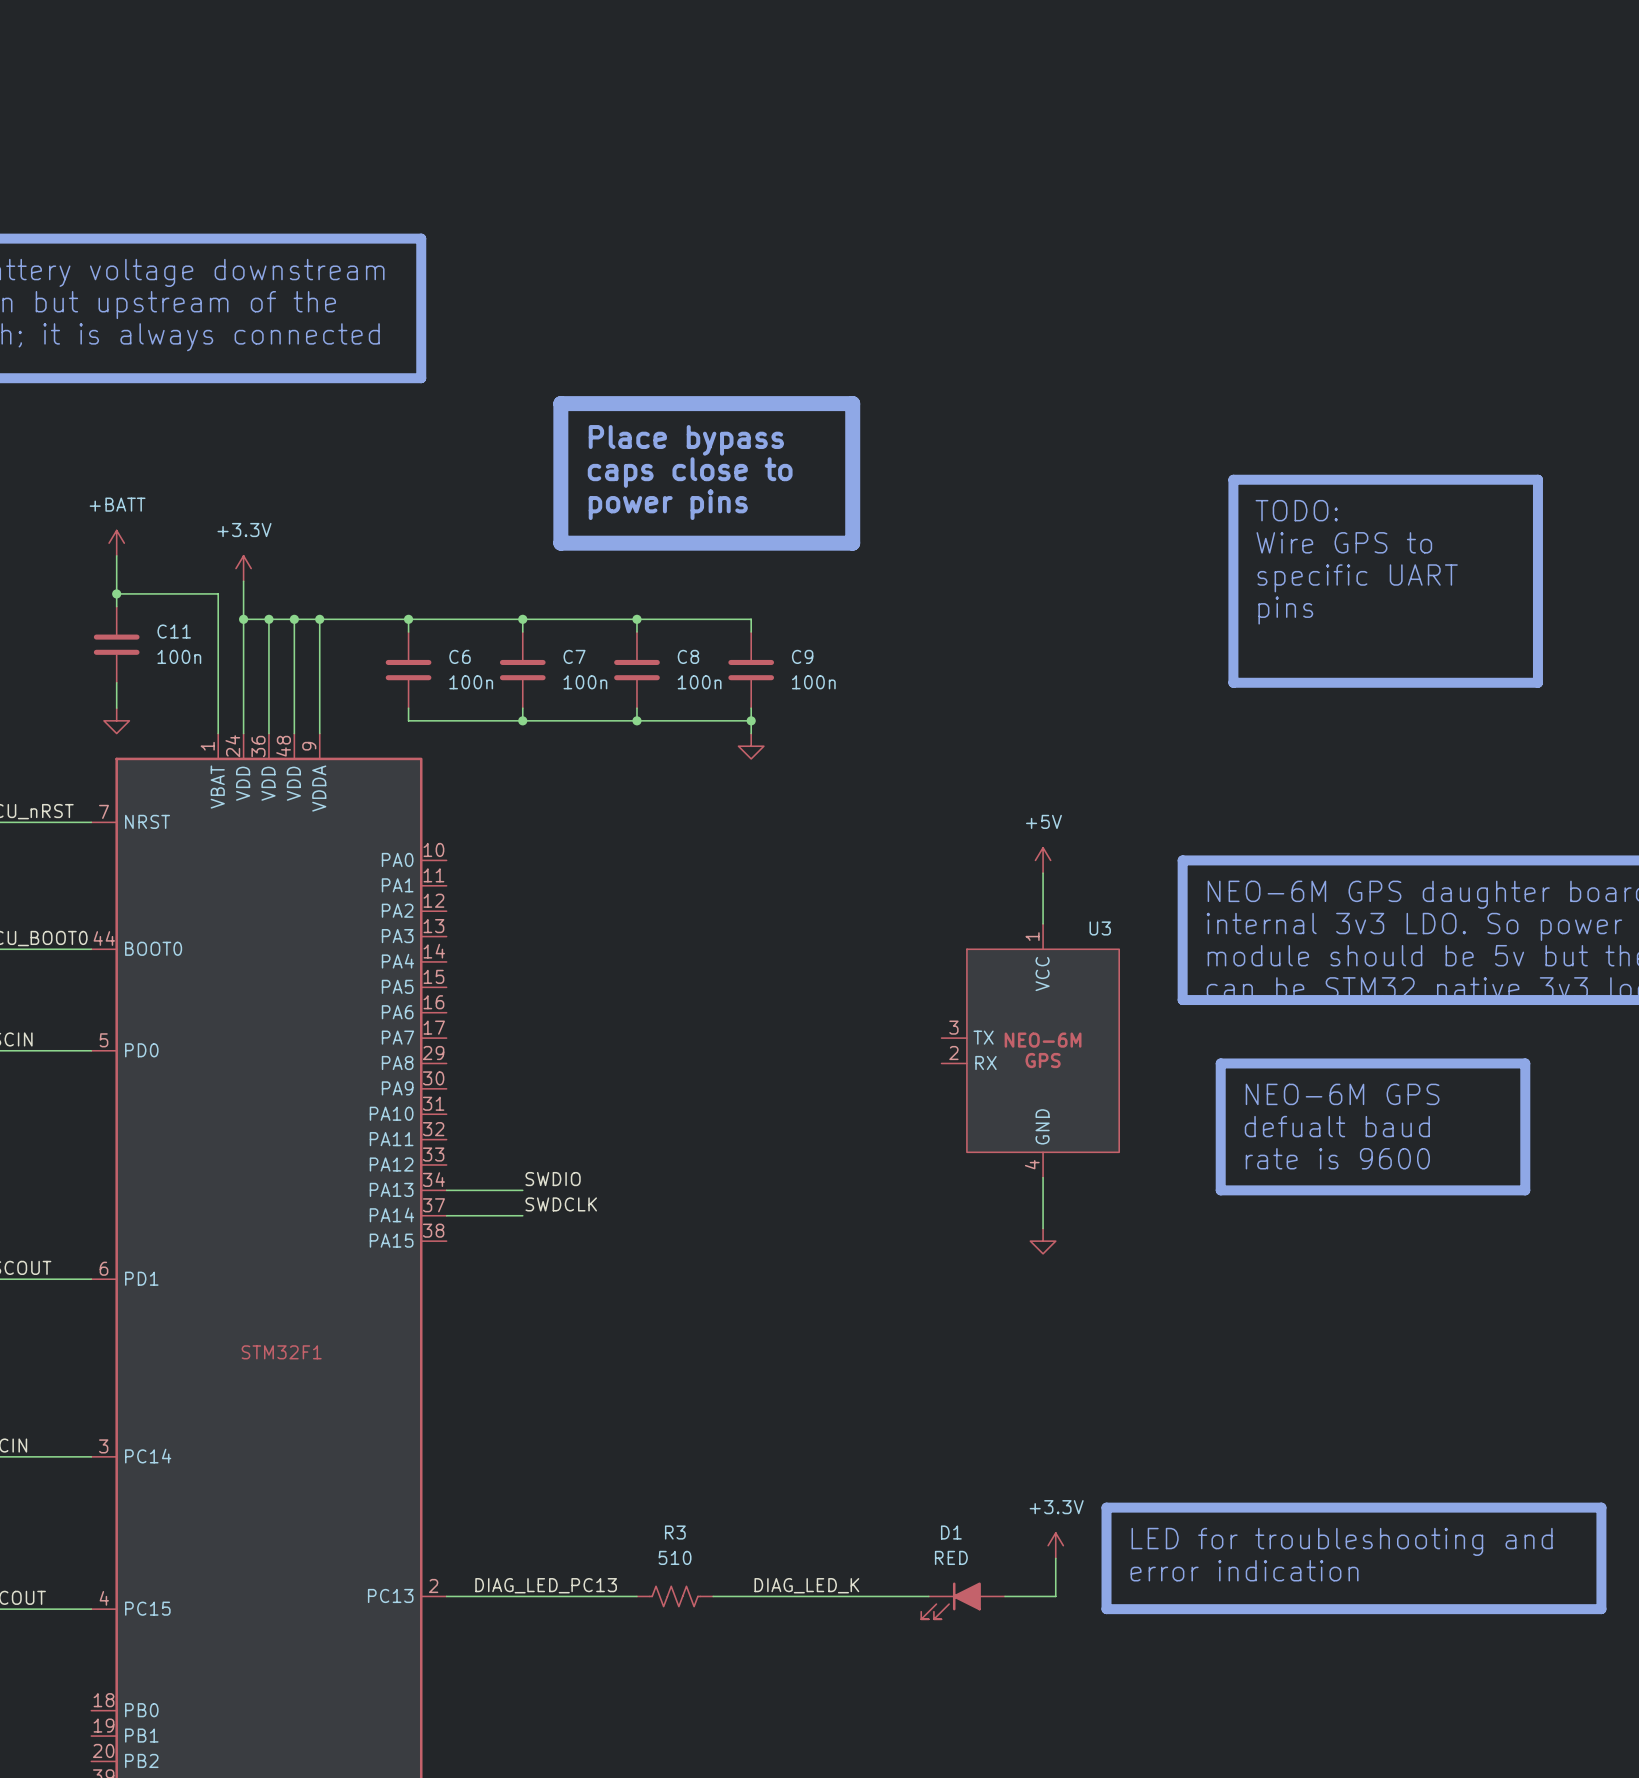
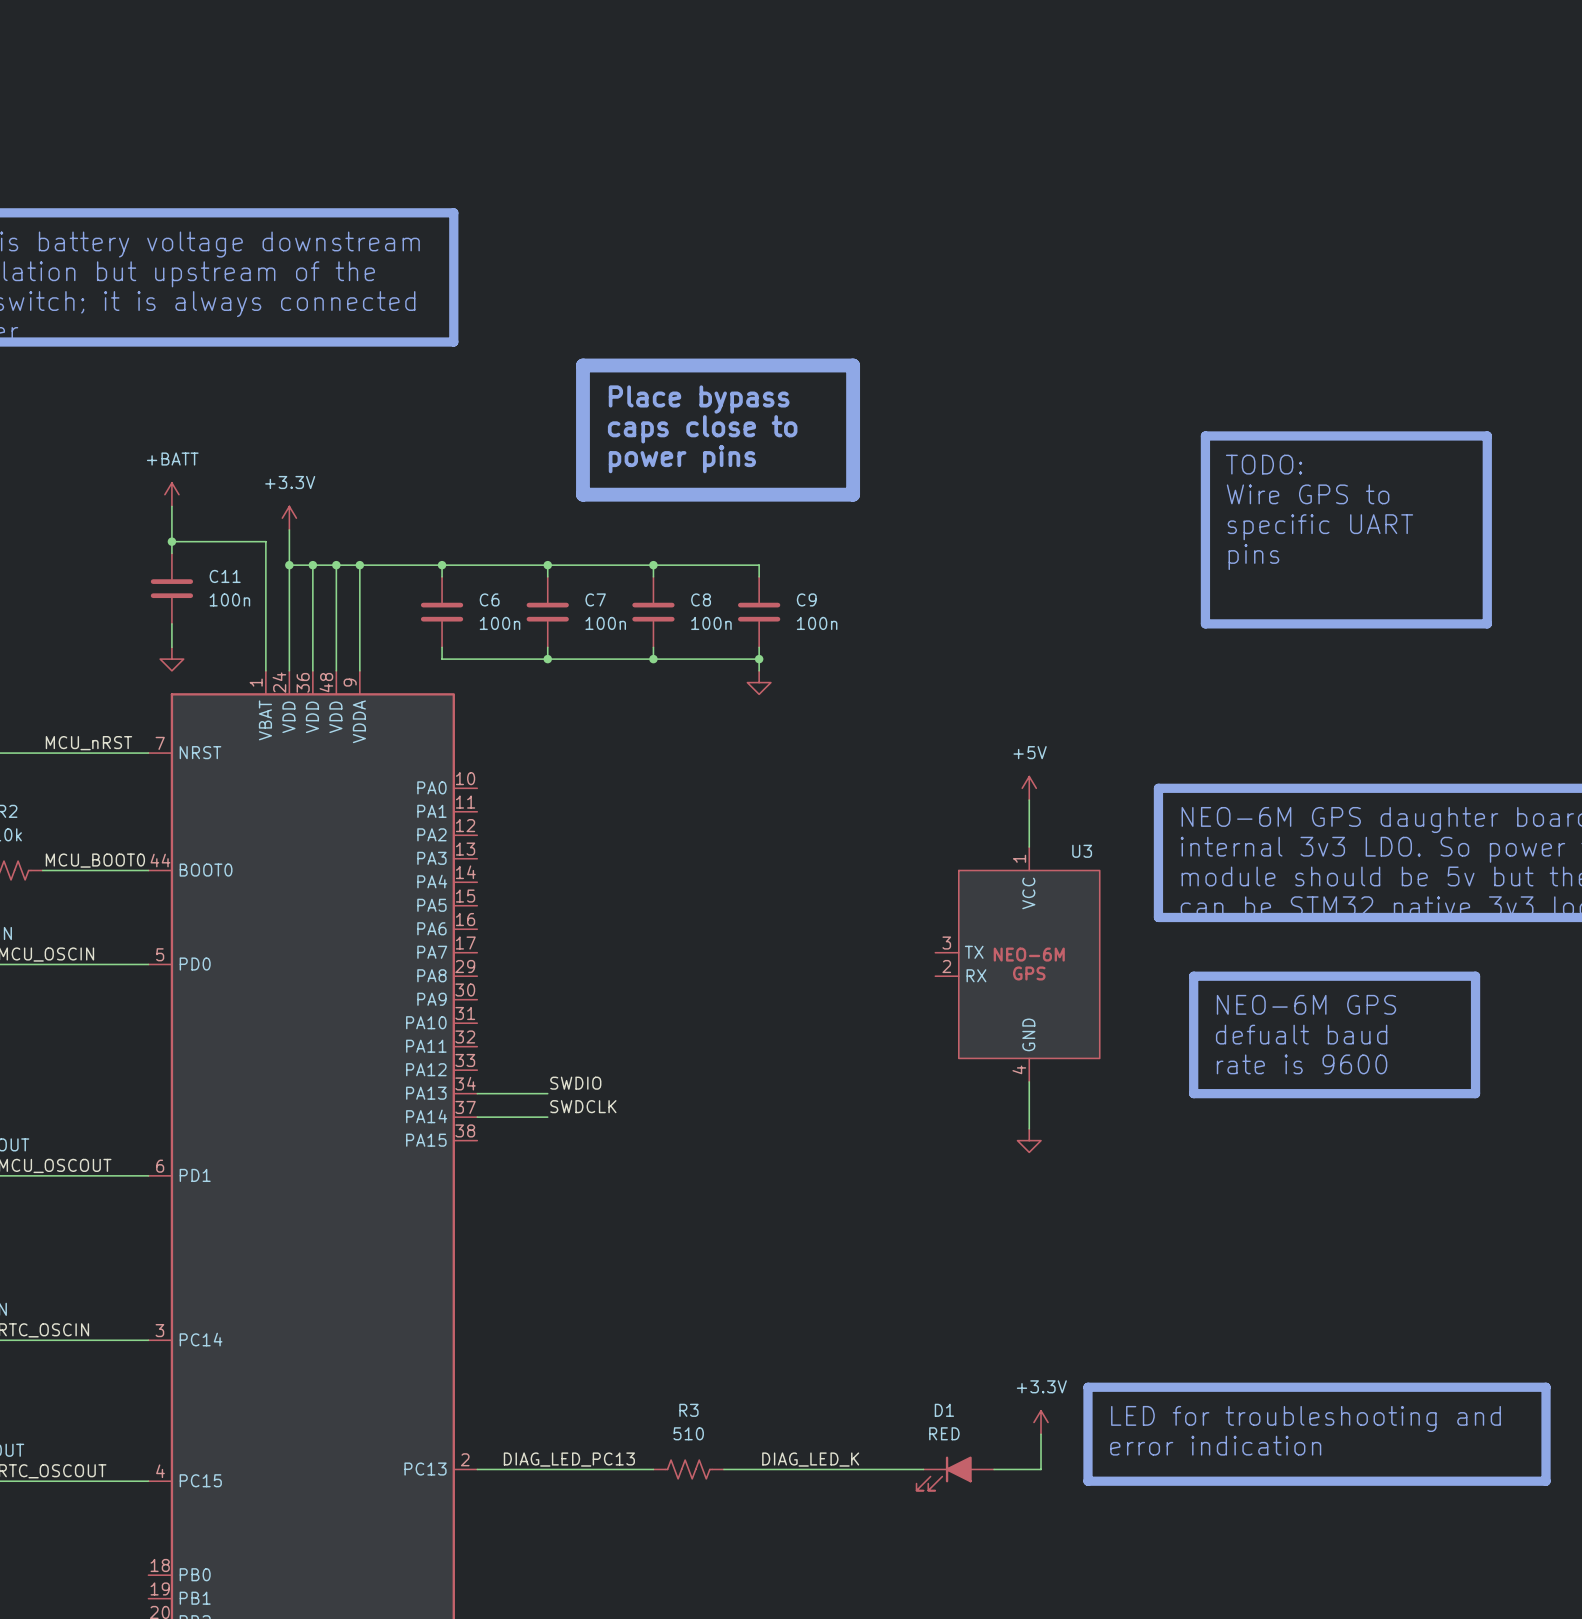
part text: STM32F1 (281, 1352) -> none

